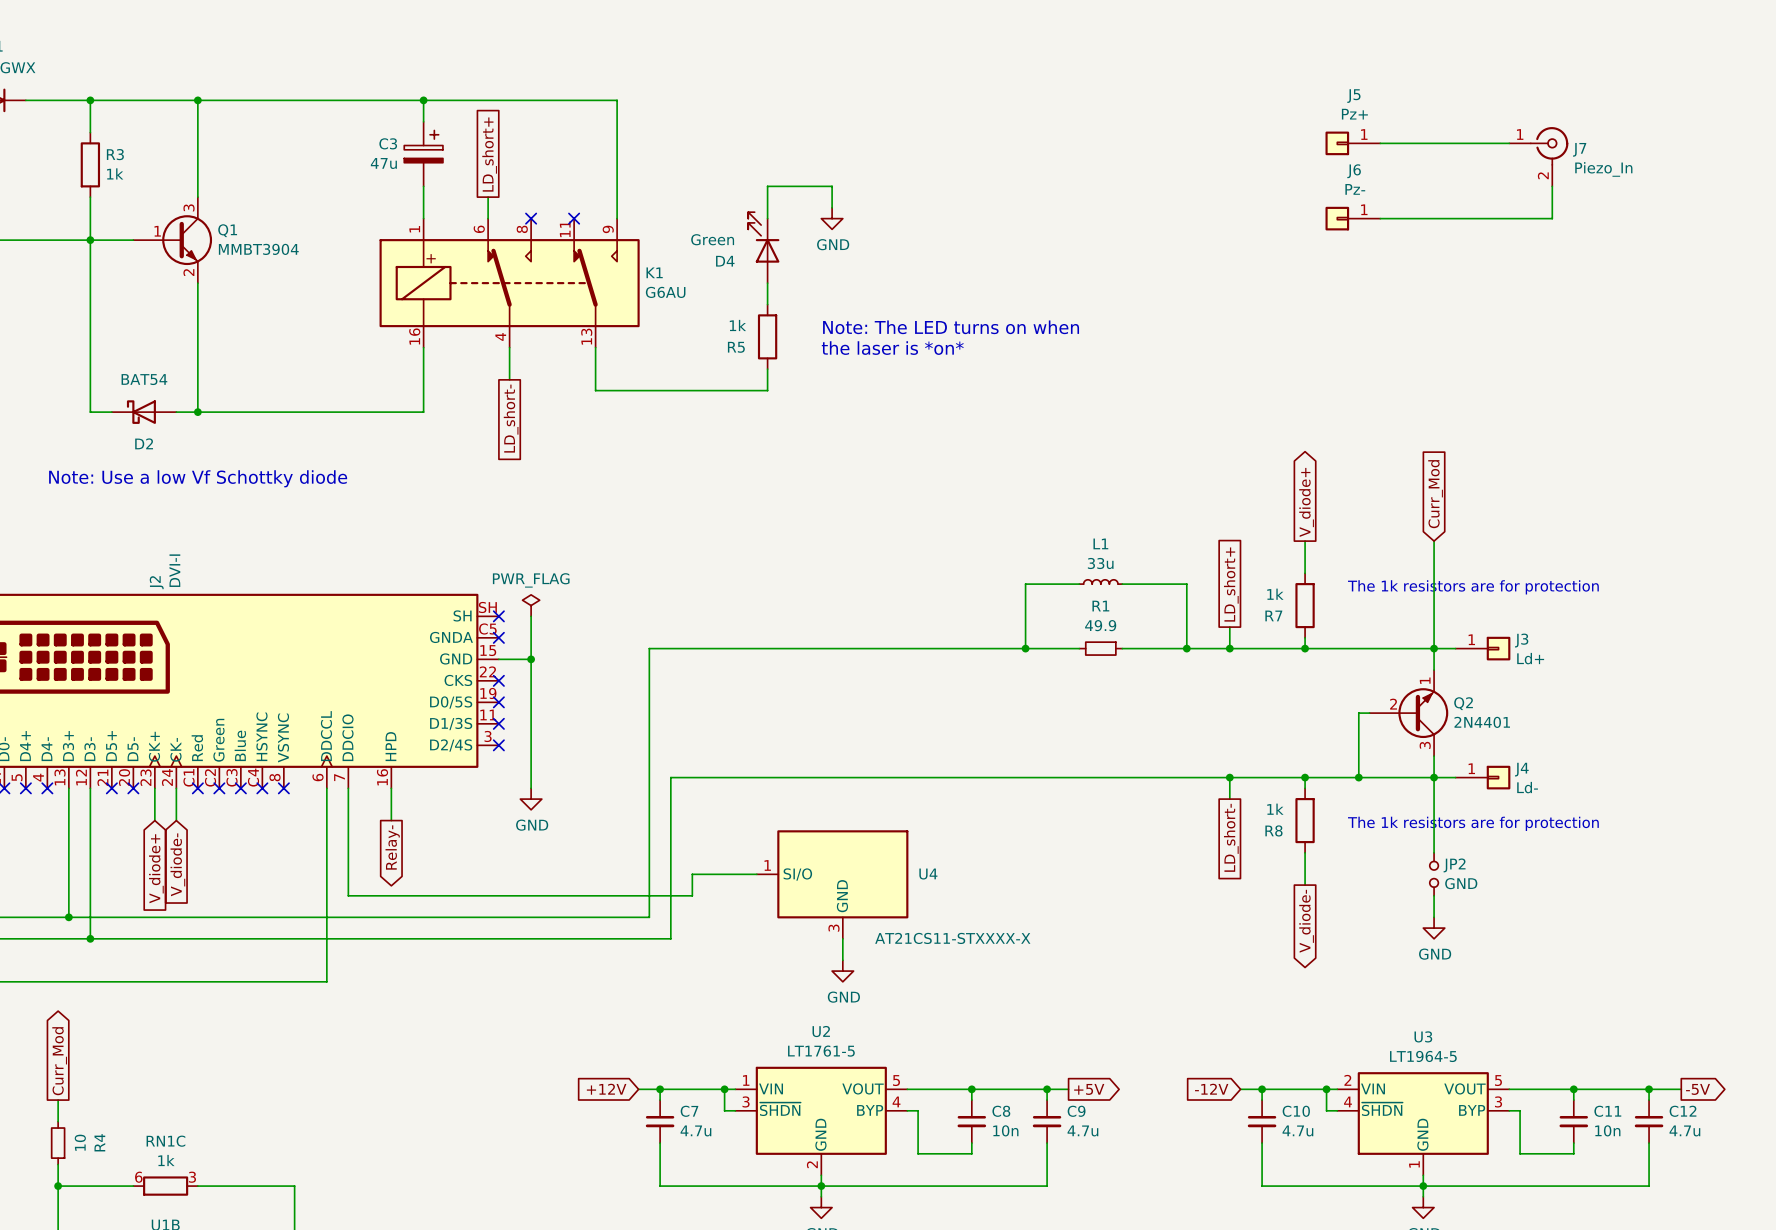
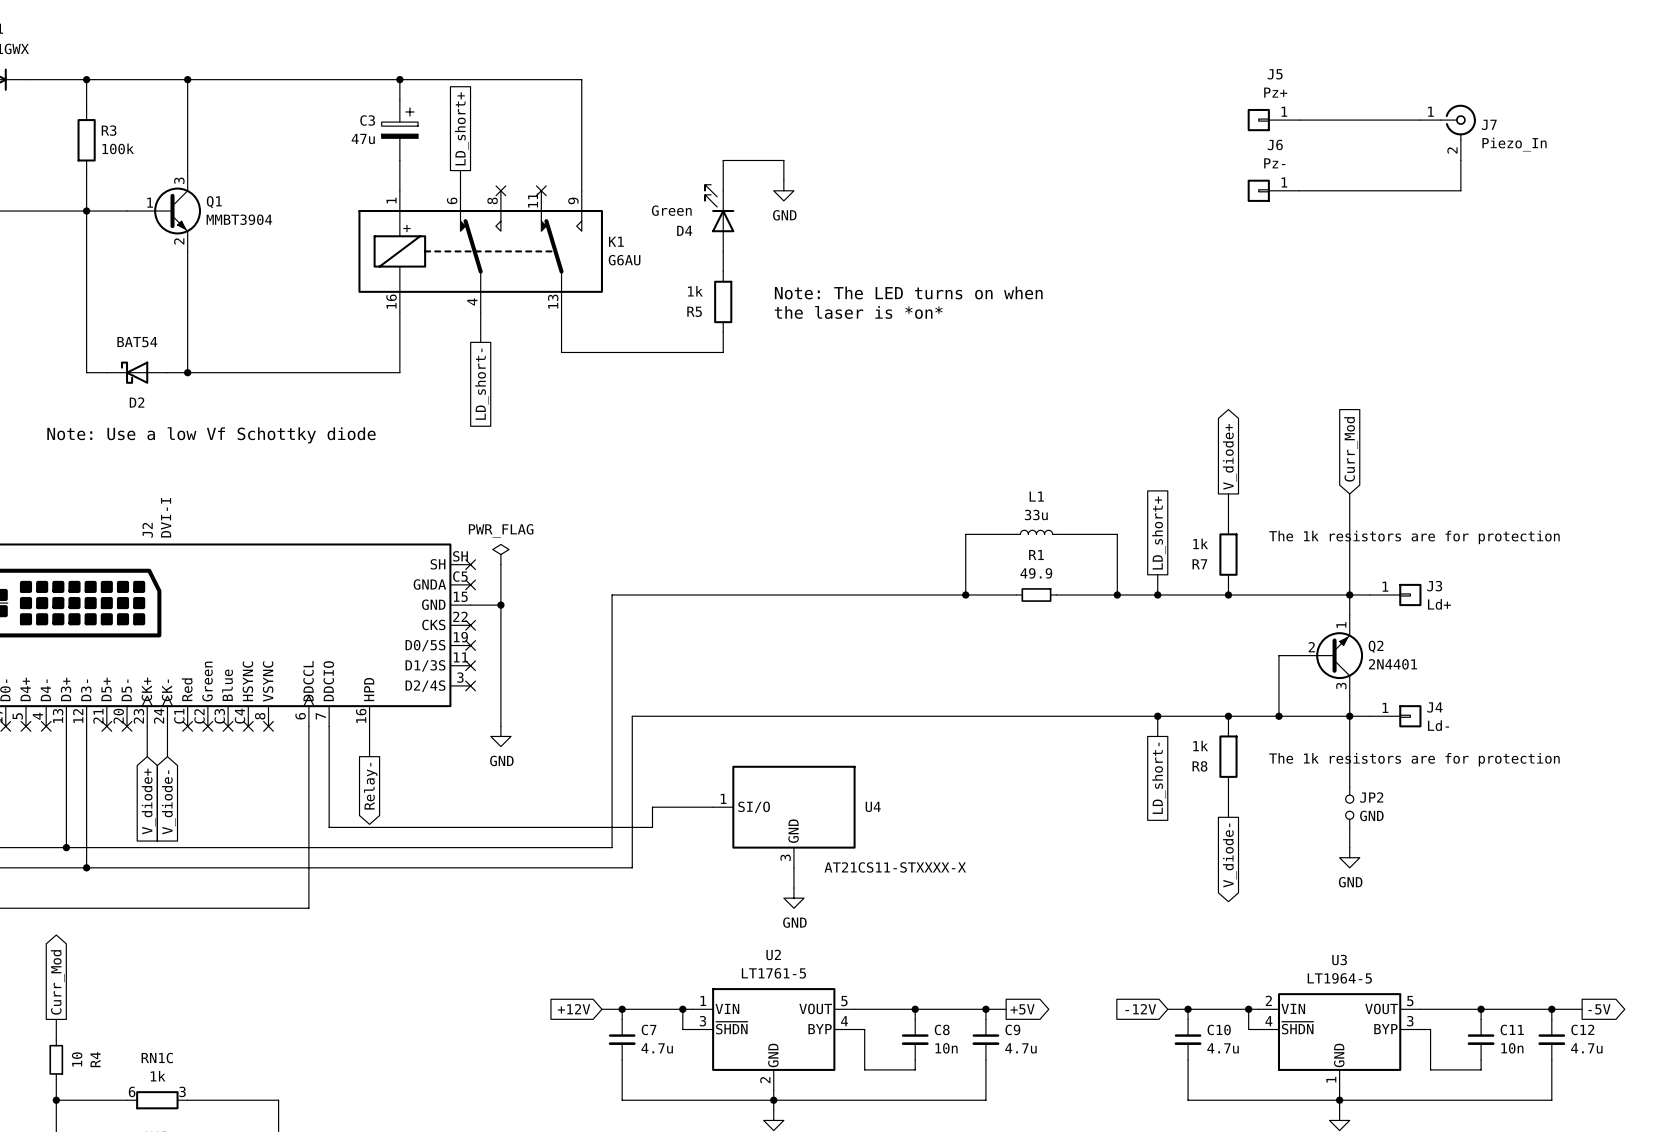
R3 value: 1k (115, 173) -> 100k (118, 148)

